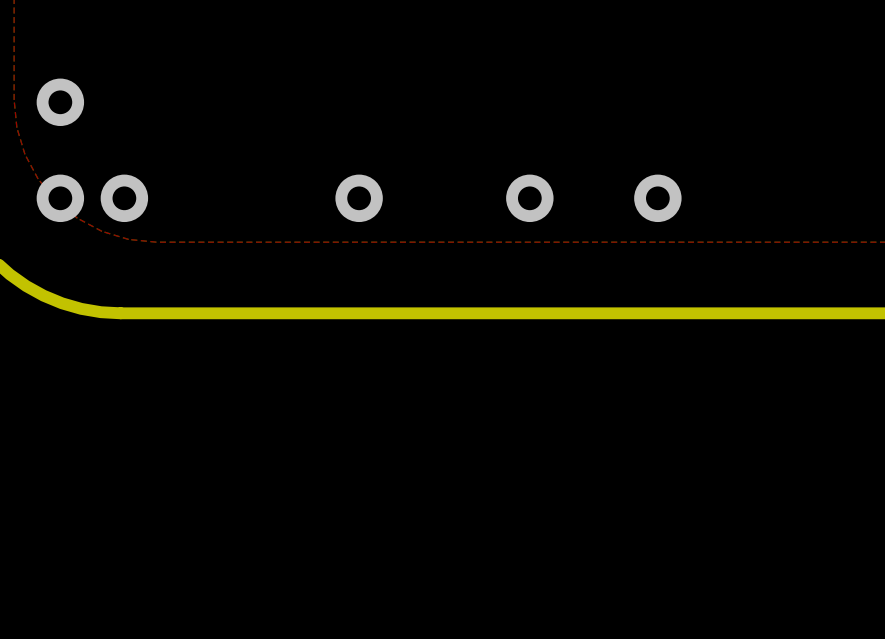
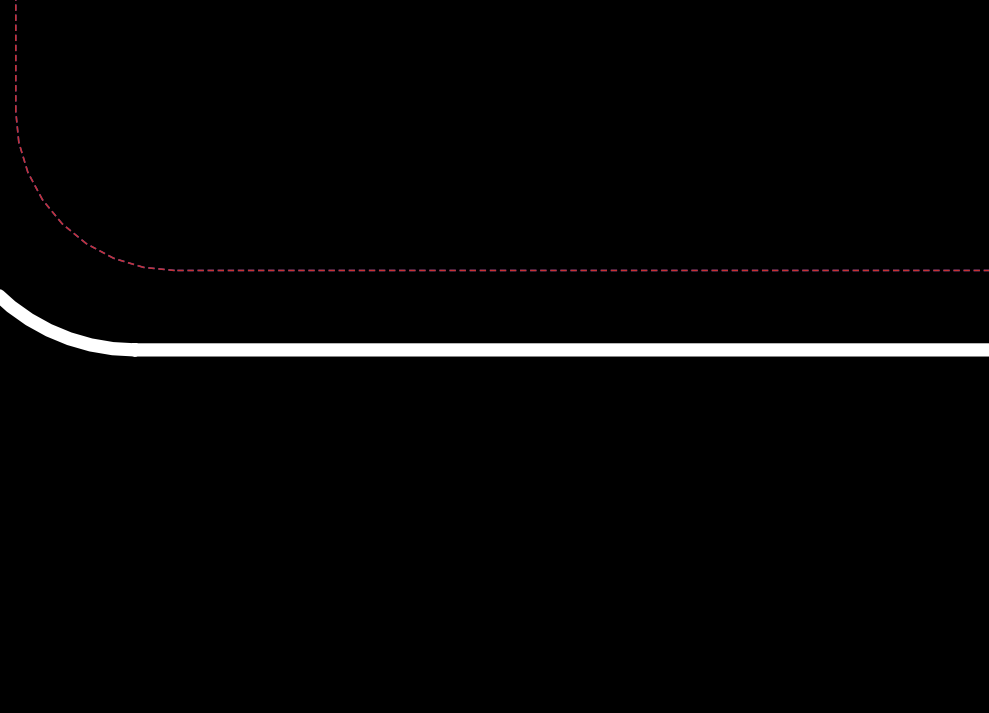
via: (60, 102) -> none
via: (60, 198) -> none
via: (124, 198) -> none
via: (359, 198) -> none
via: (529, 198) -> none
via: (657, 198) -> none

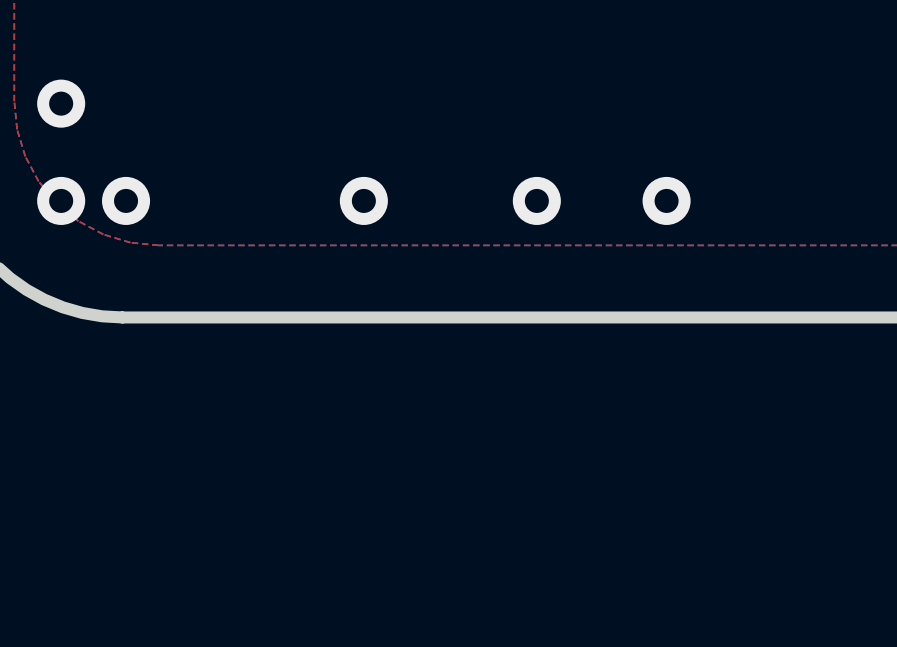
via: none -> (61, 103)
via: none -> (61, 200)
via: none -> (126, 200)
via: none -> (363, 200)
via: none -> (536, 200)
via: none -> (666, 200)

